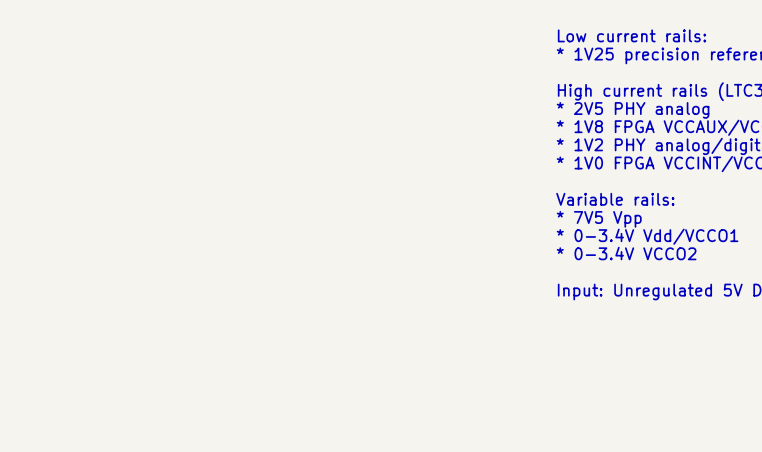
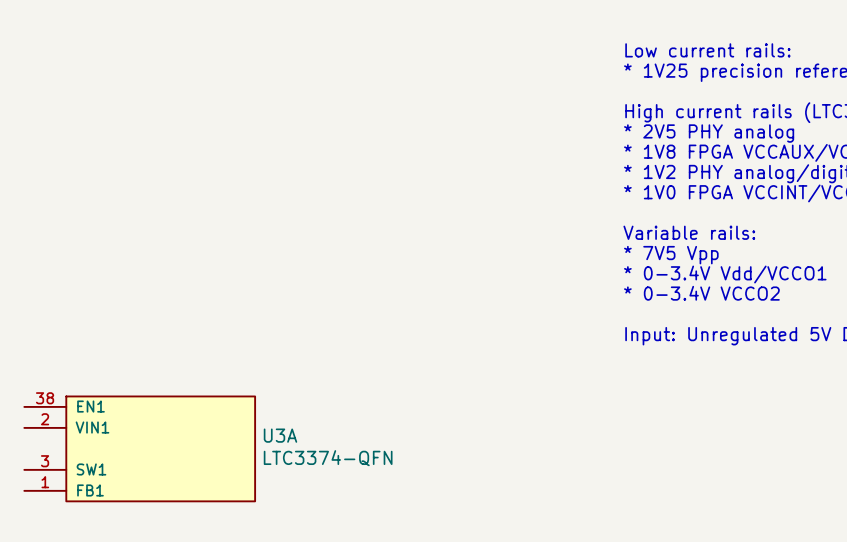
U3A: none -> LTC3374-QFN (139, 448)

